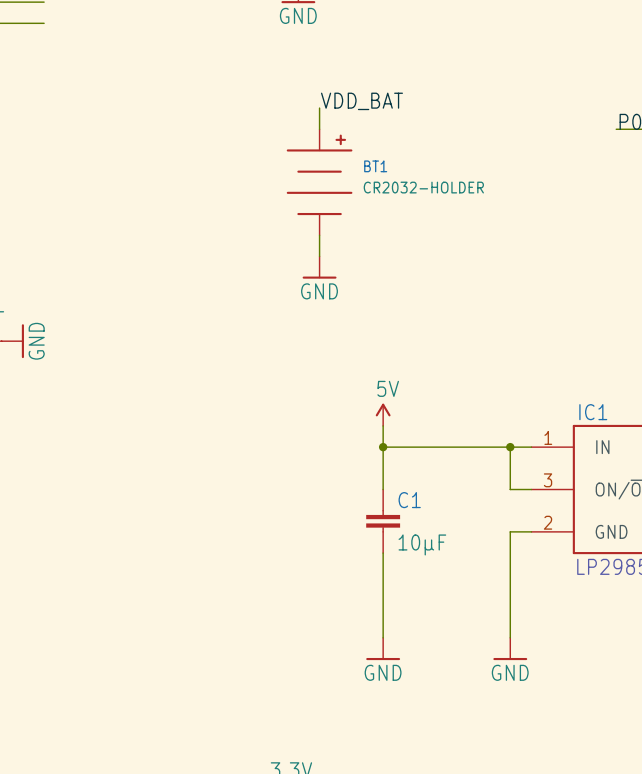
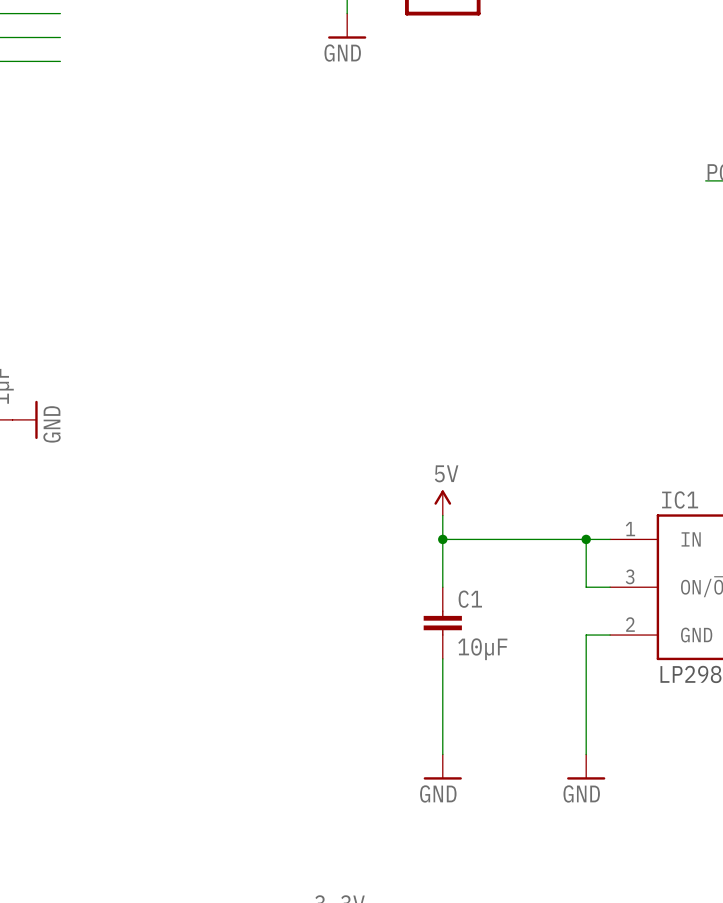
label: VDD_BAT (361, 101) -> none
wire: (319, 108) (319, 129) -> none
BT1: CR2032-HOLDER (319, 182) -> none
wire: (319, 235) (319, 256) -> none
power symbol: GND (319, 267) -> none

